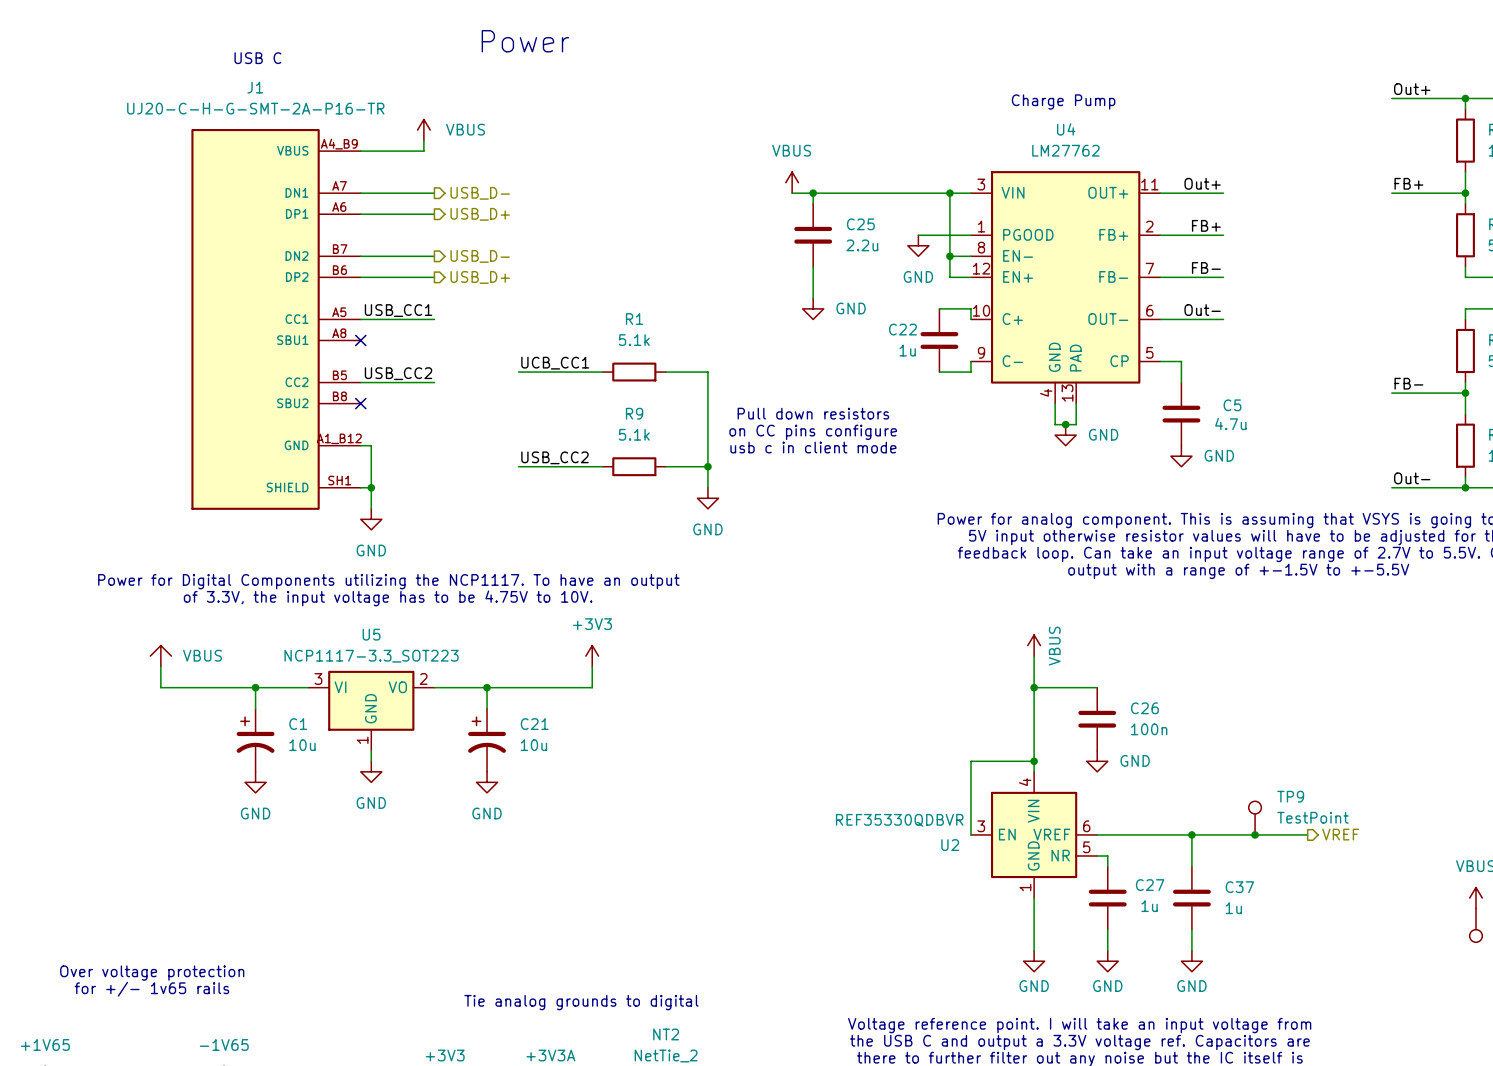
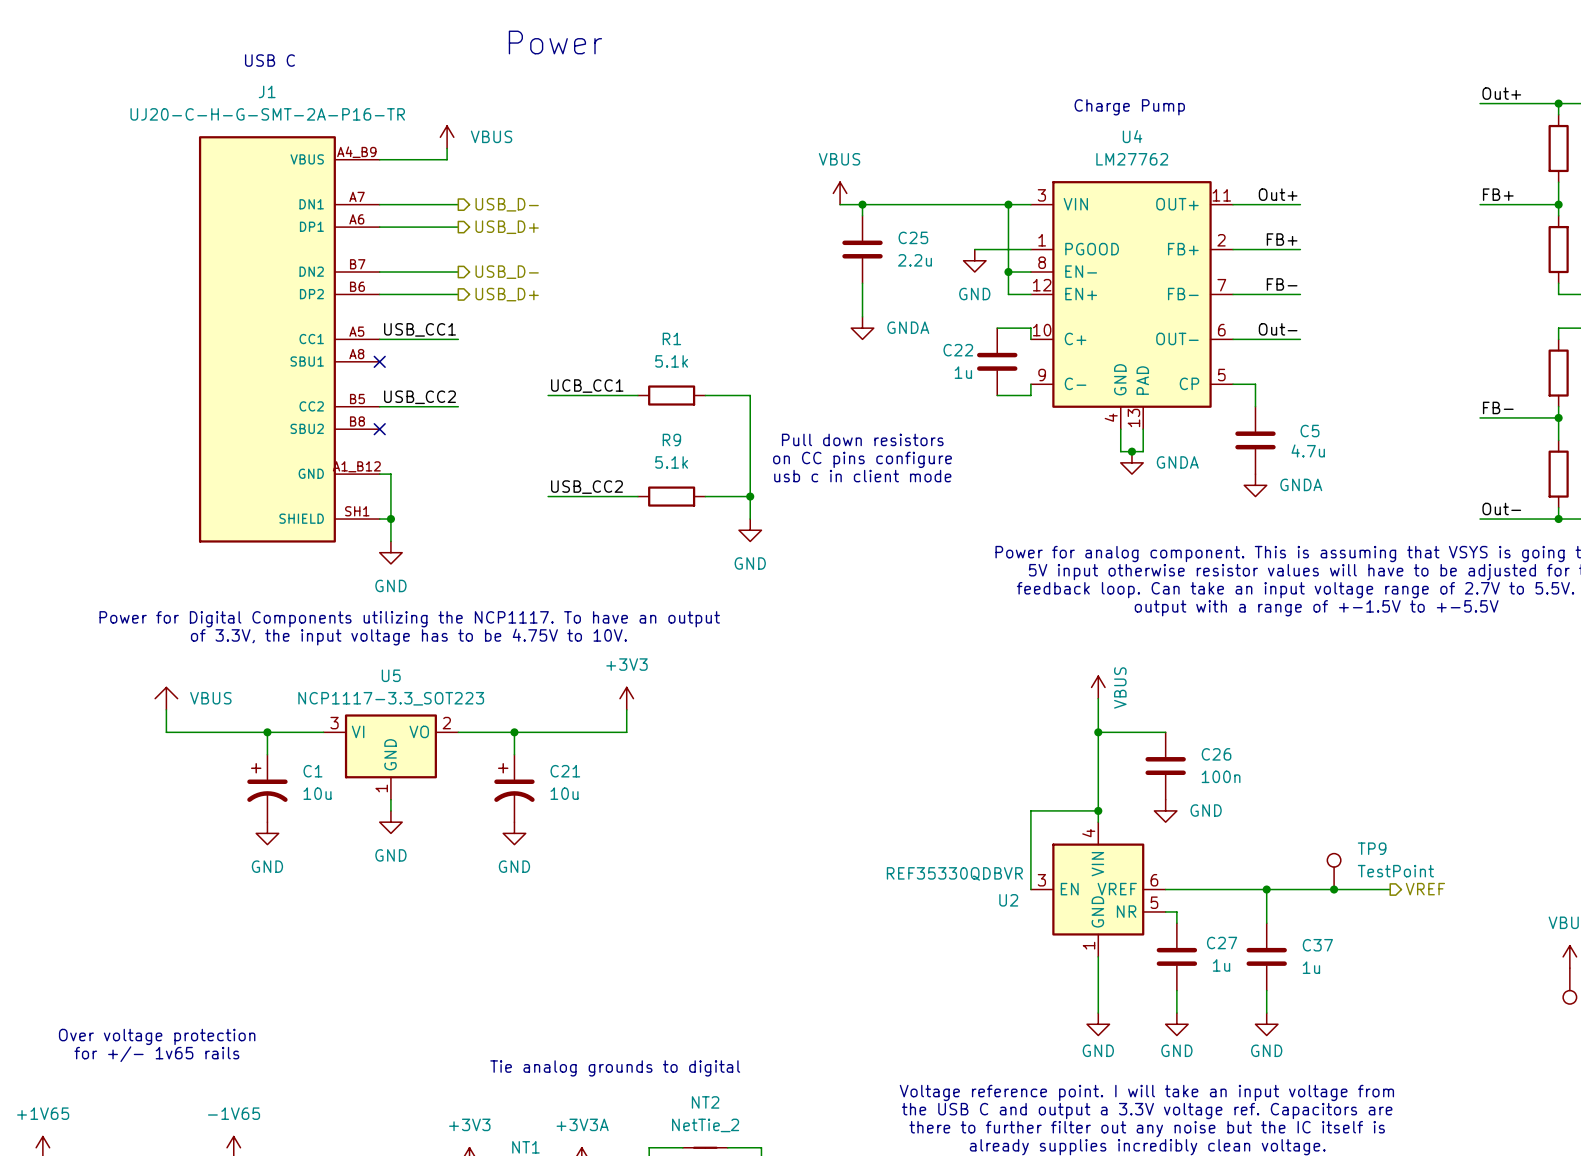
power symbol: GND (813, 308) -> GNDA (862, 328)
power symbol: GND (1065, 435) -> GNDA (1131, 462)
power symbol: GND (1181, 456) -> GNDA (1255, 485)

